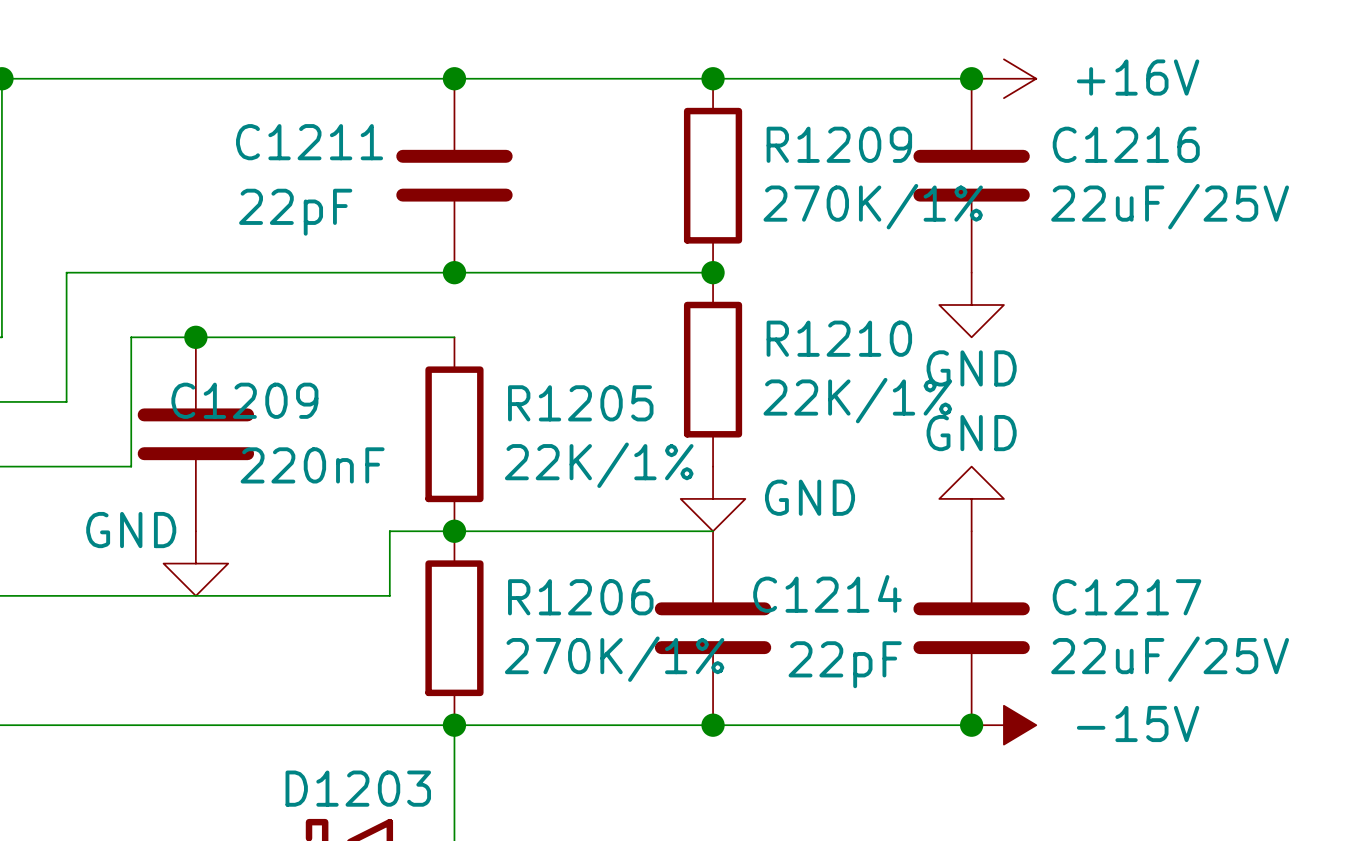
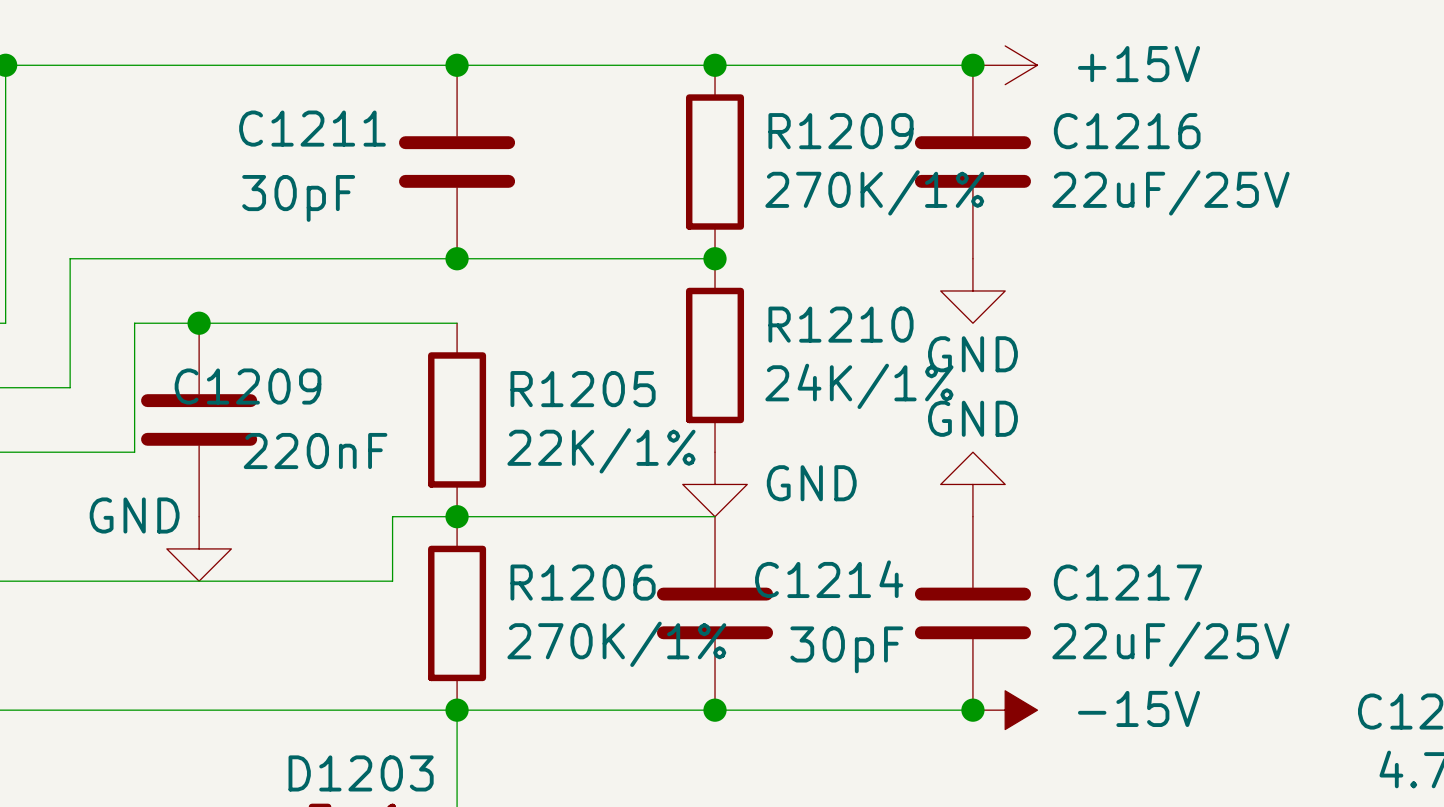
power symbol: +16V (1003, 78) -> +15V (1005, 65)
C1211 value: 22pF (295, 212) -> 30pF (298, 198)
R1210 value: 22K/1% (857, 400) -> 24K/1% (859, 386)
C1214 value: 22pF (845, 664) -> 30pF (846, 649)

